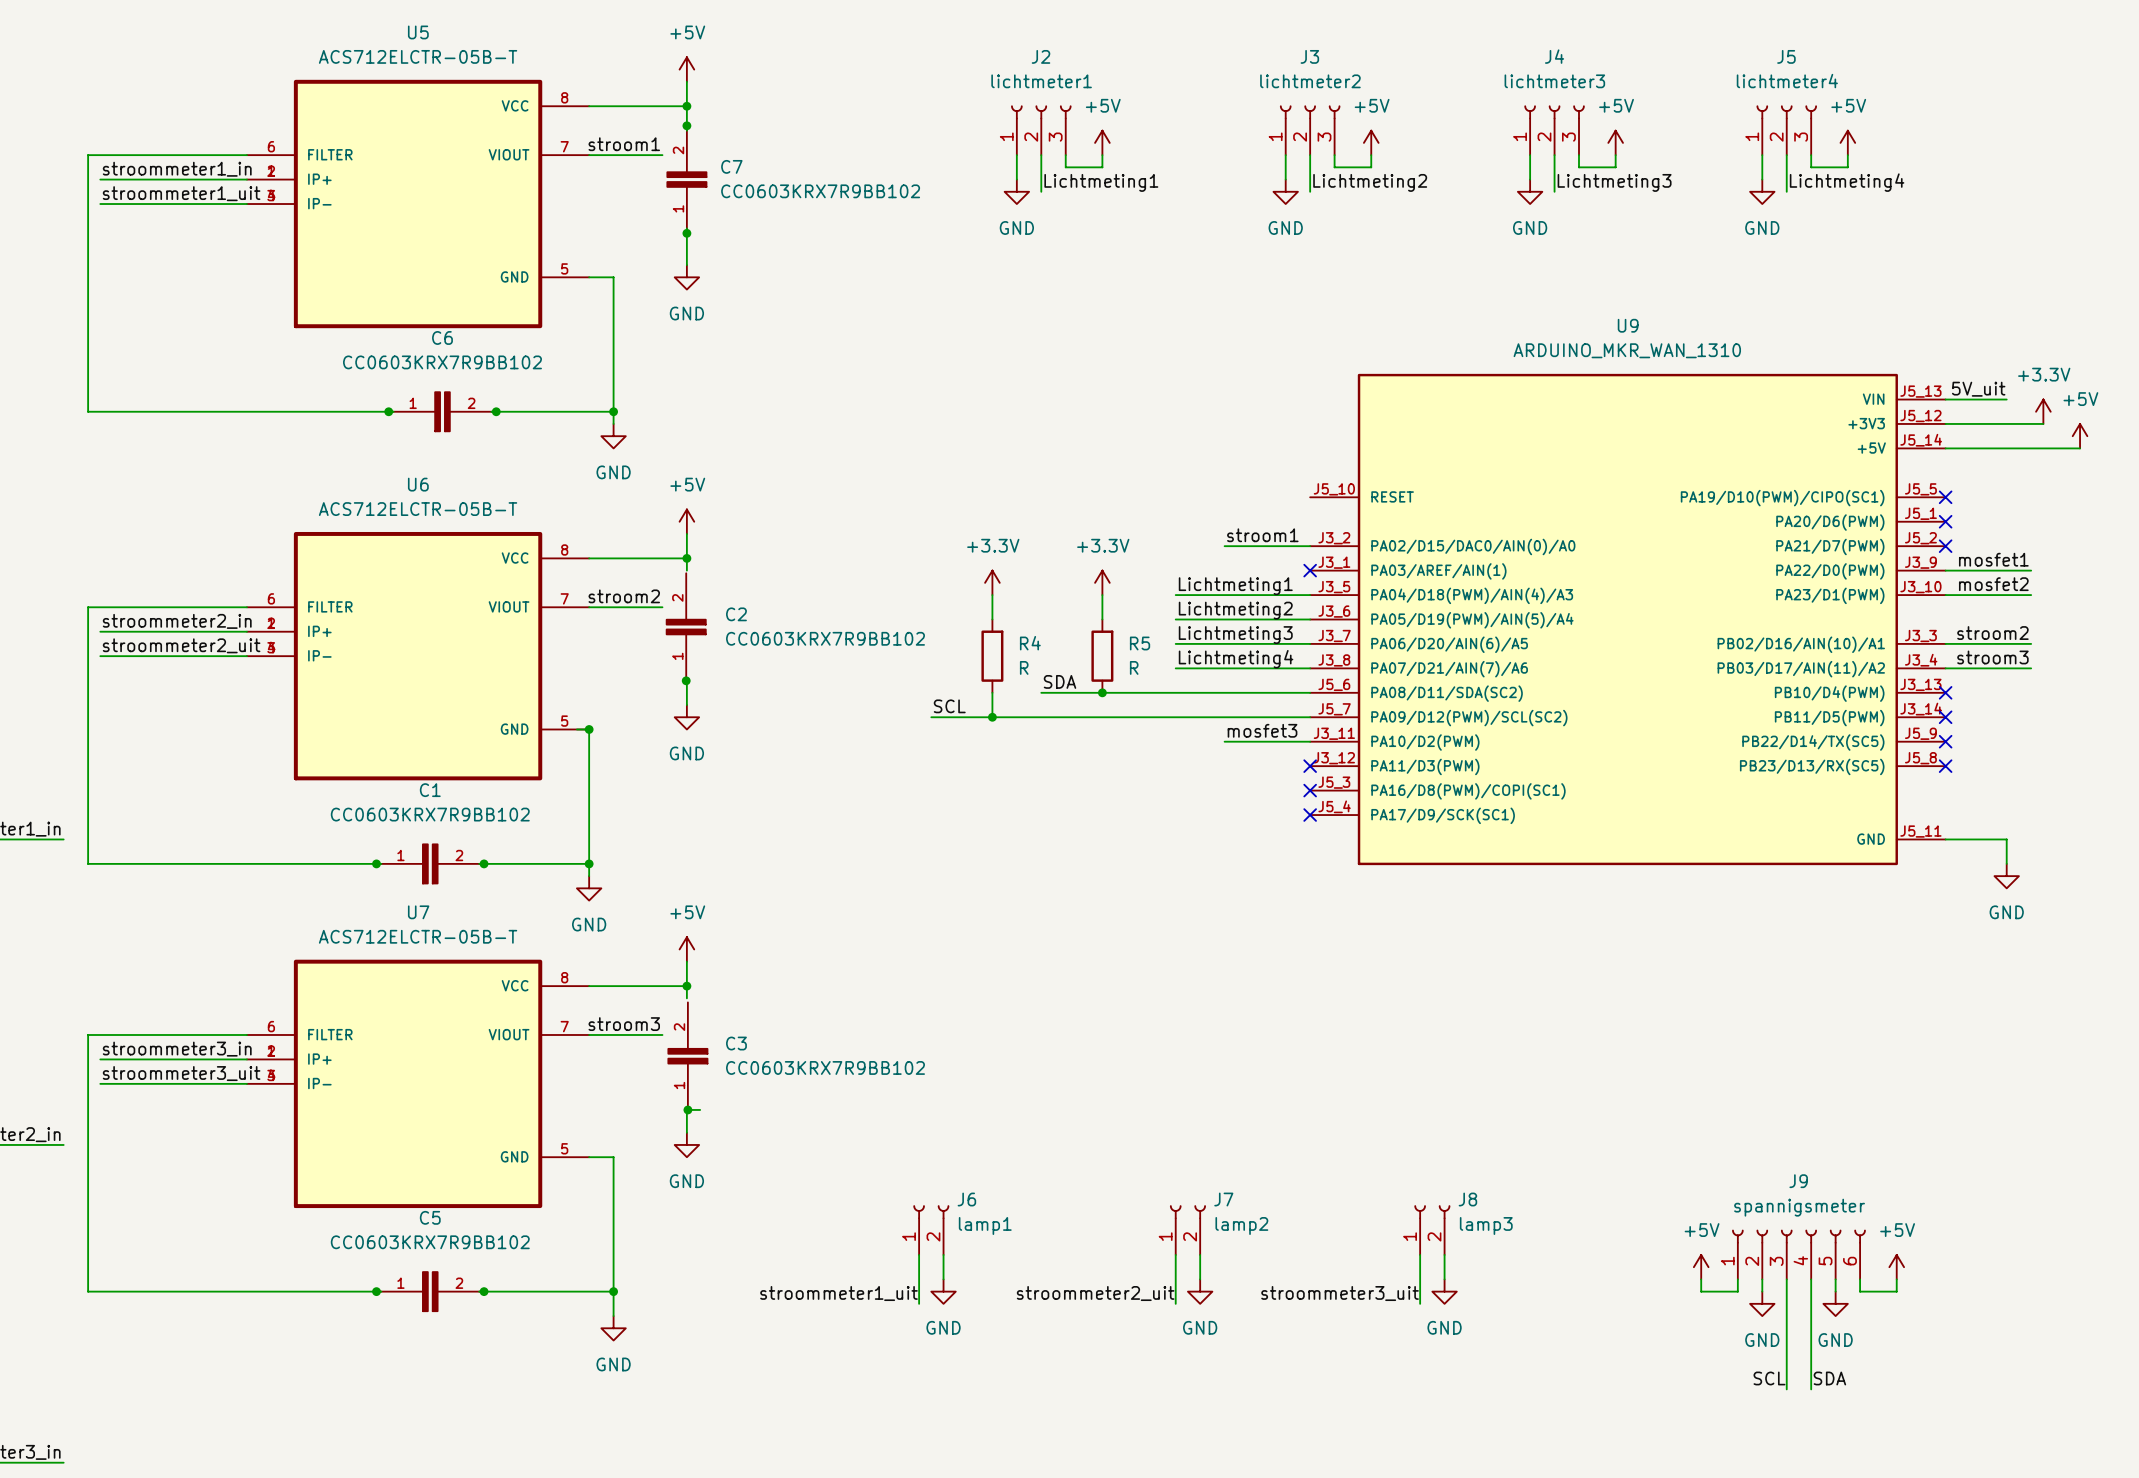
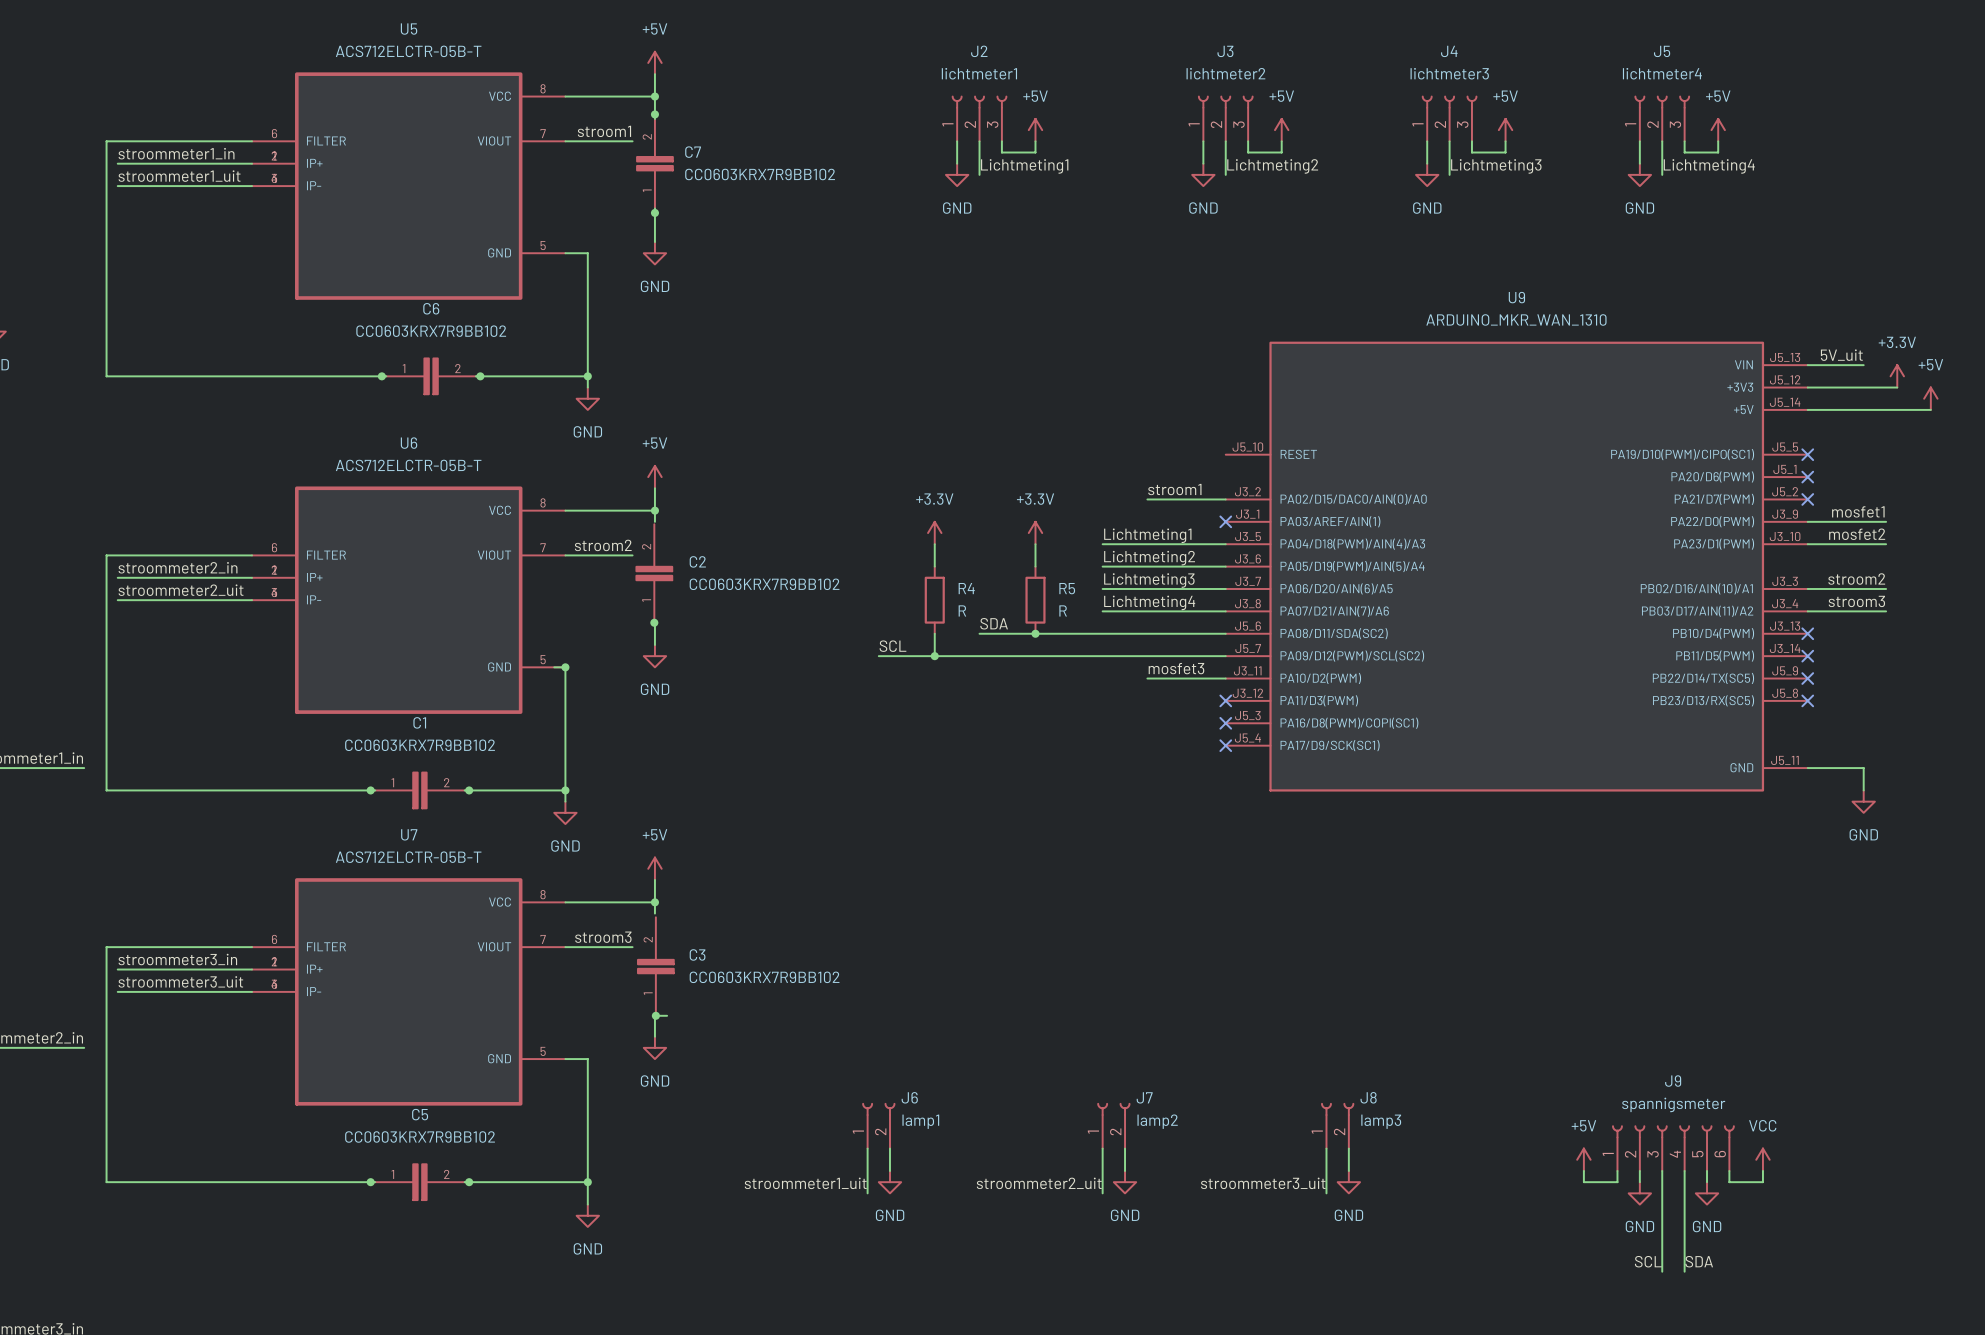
power symbol: +5V (1896, 1267) -> VCC (1762, 1159)

